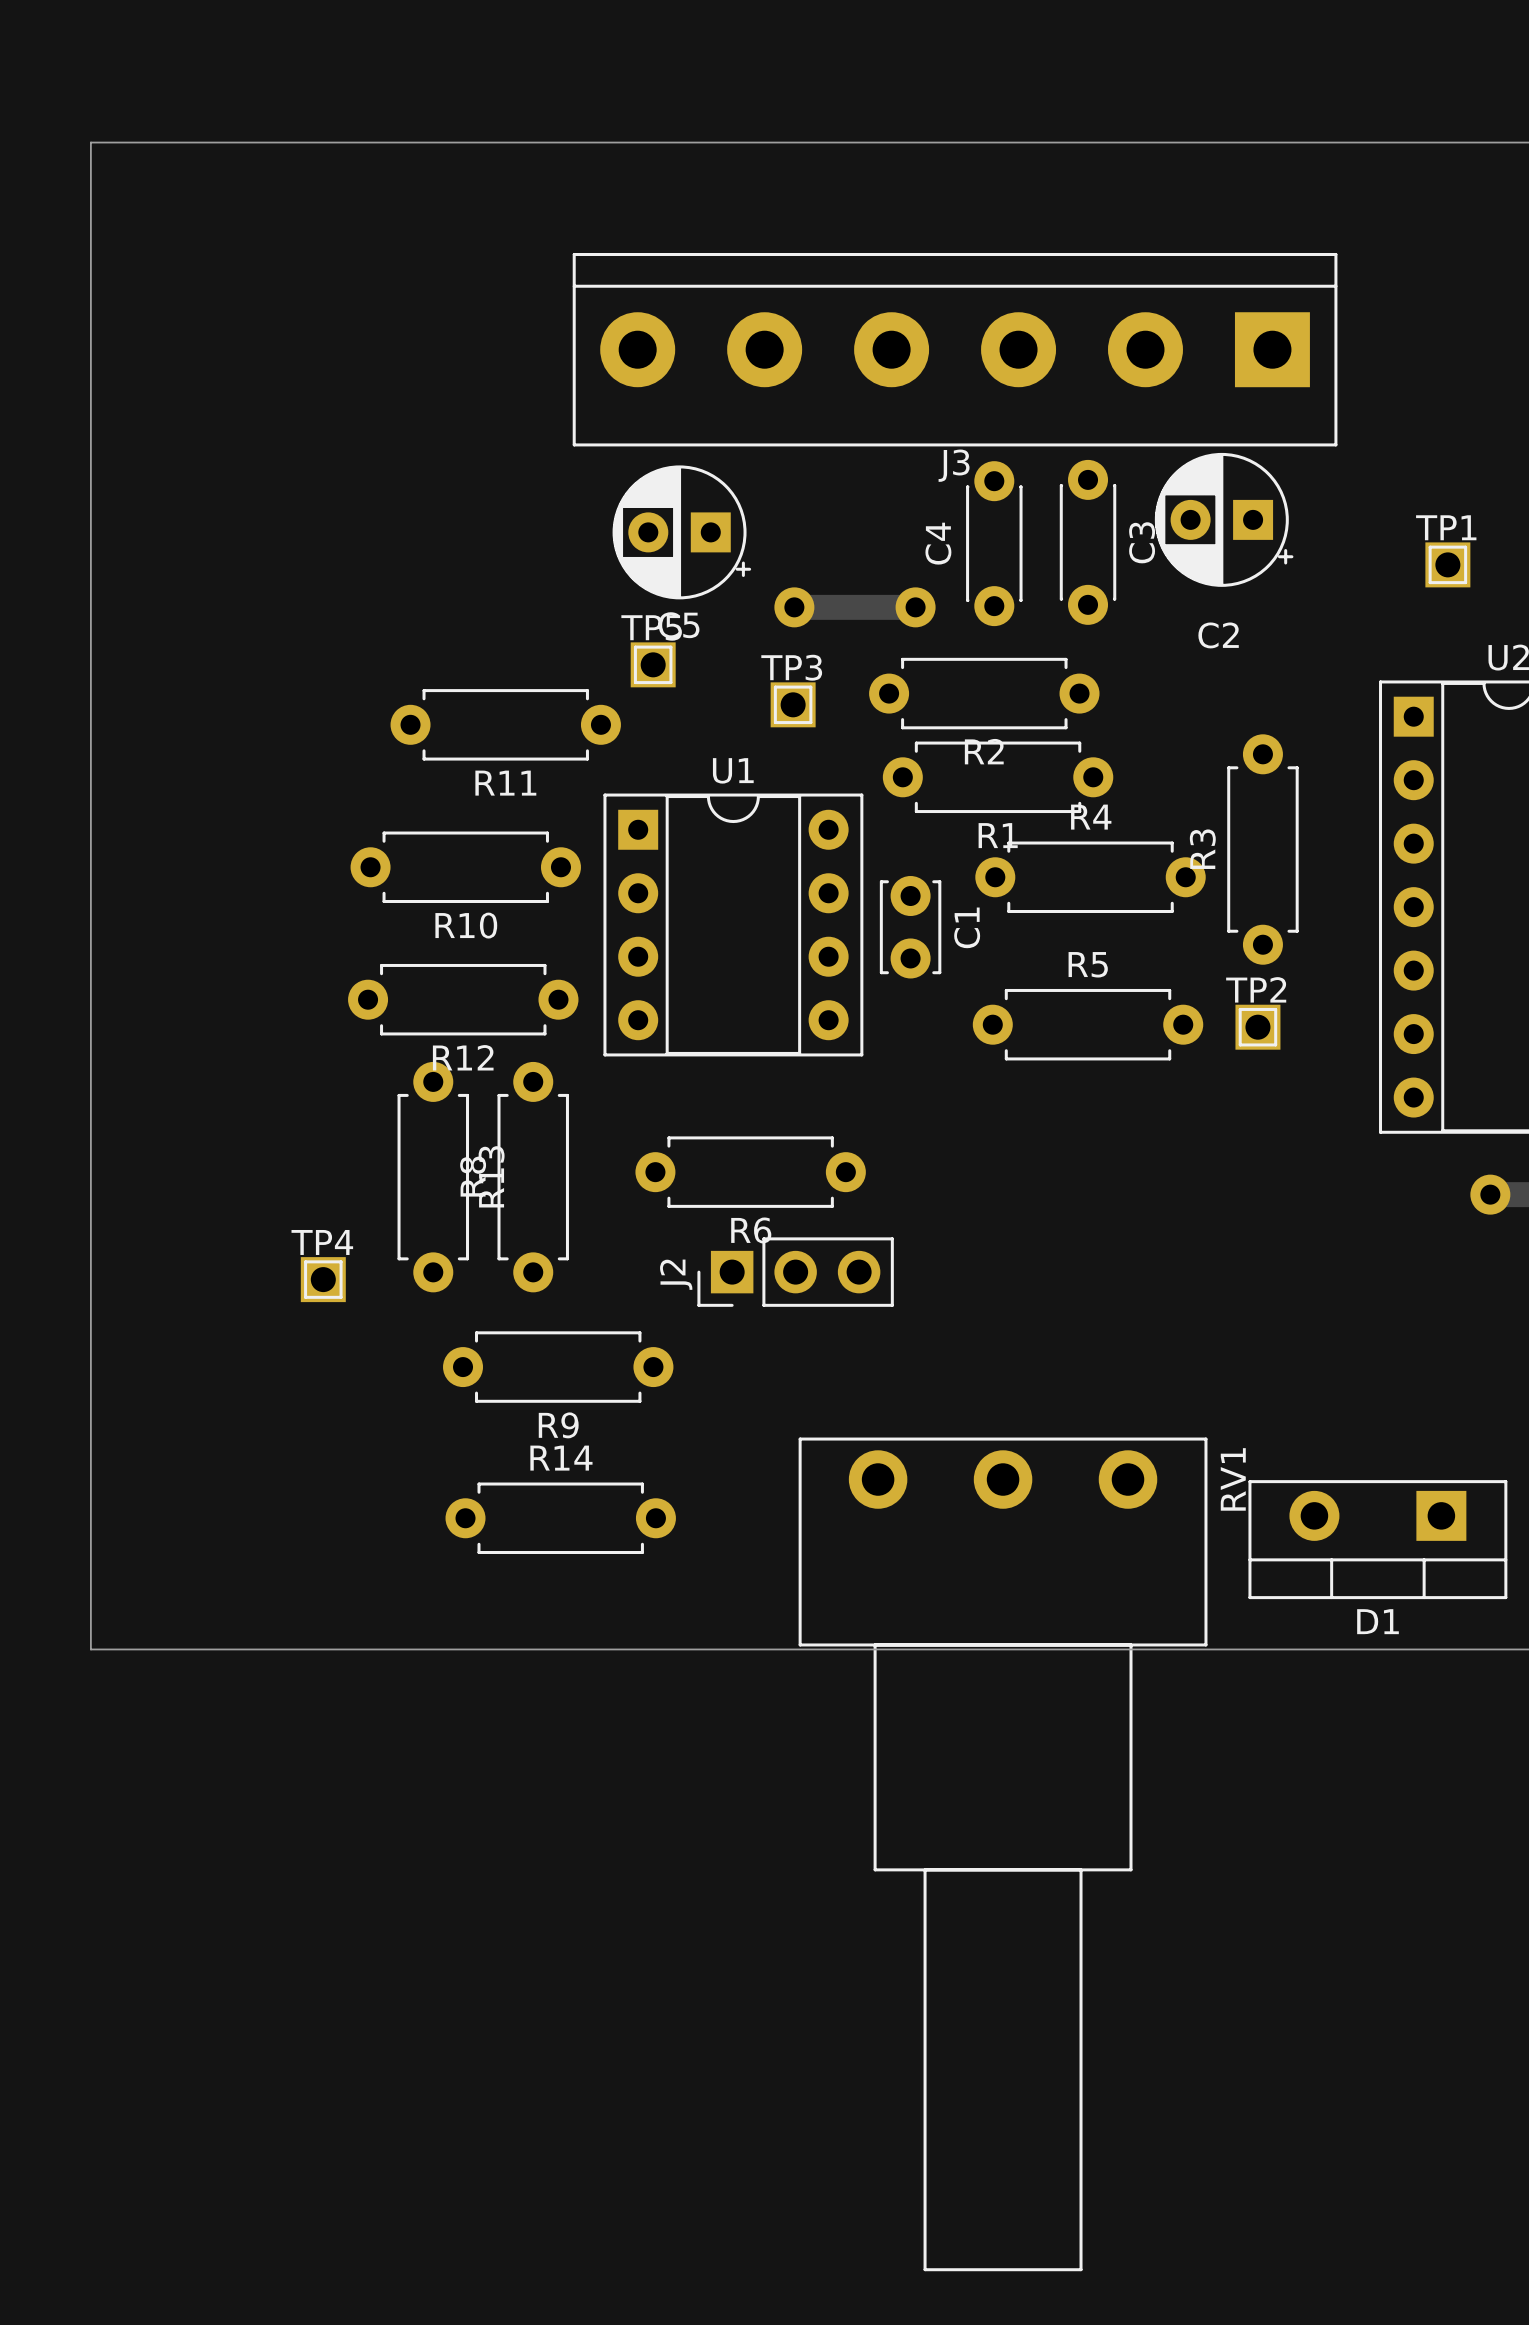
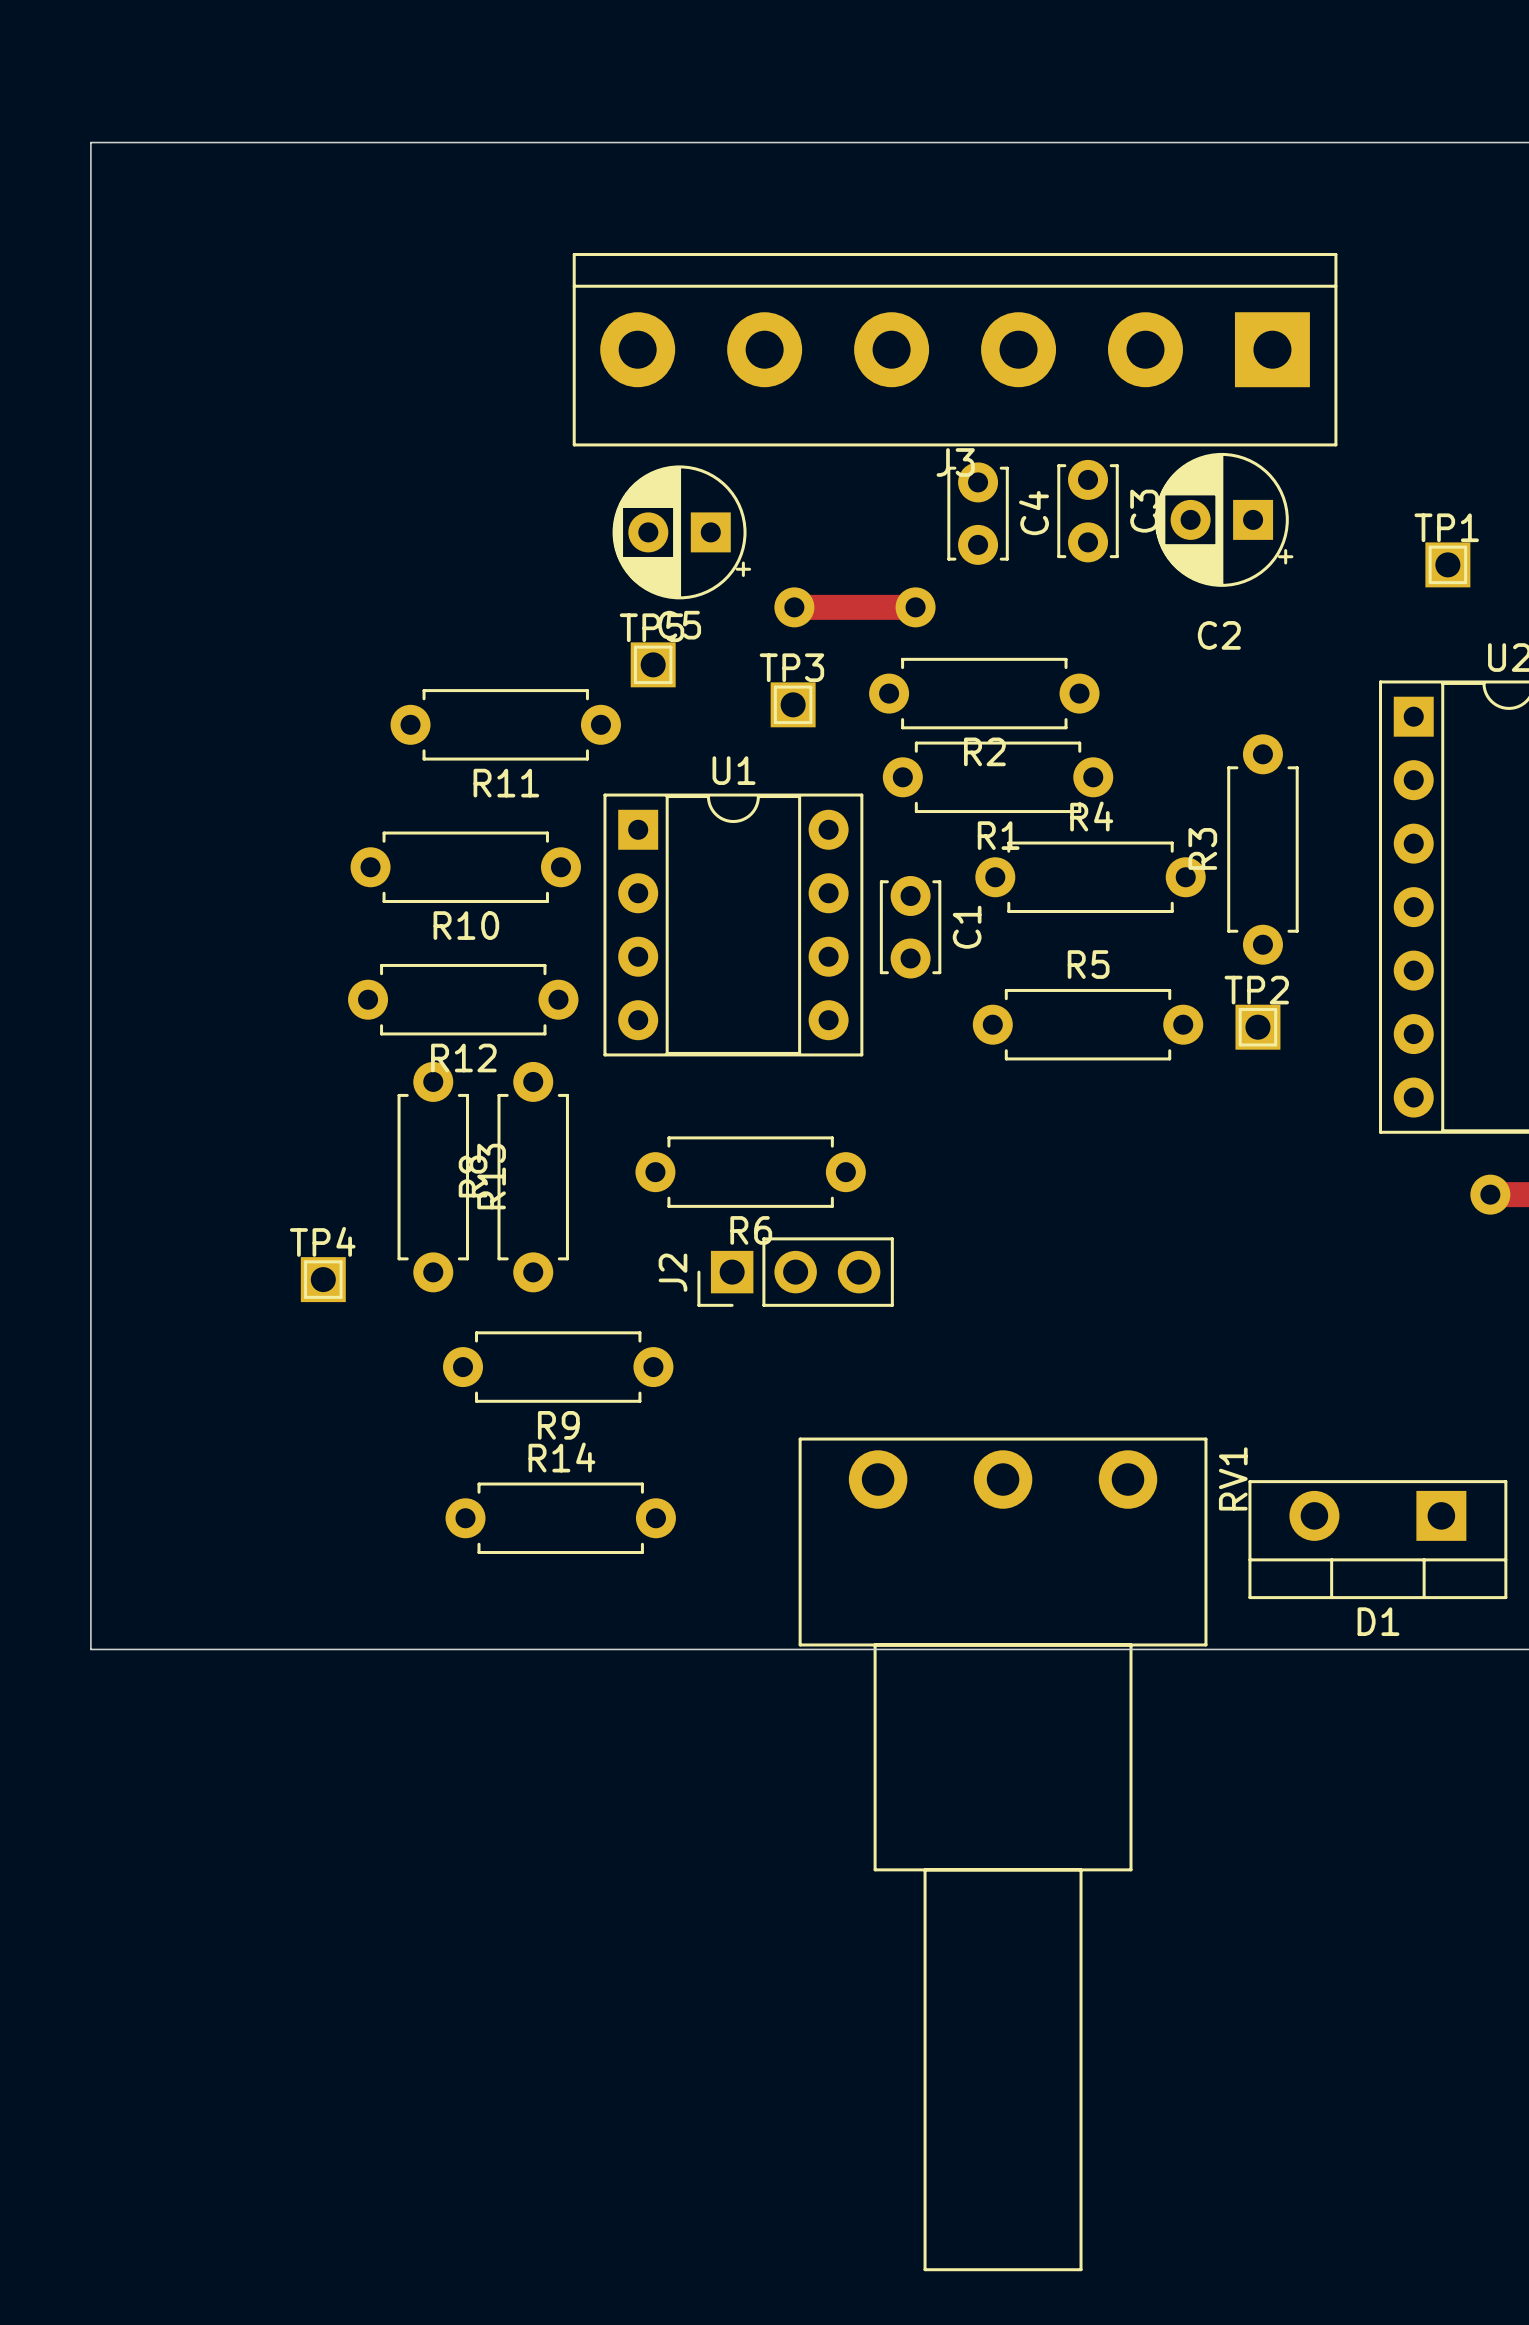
C3 footprint: [1059, 459, 1117, 625] -> [1057, 459, 1119, 563]
C4 footprint: [966, 461, 1023, 627] -> [947, 462, 1009, 565]
C4 name position: C4 (938, 543) -> C4 (1034, 513)

